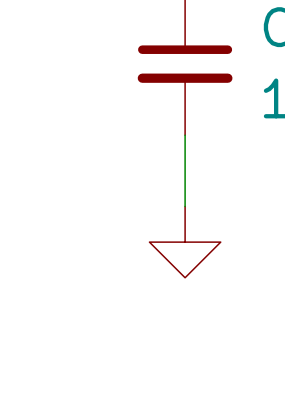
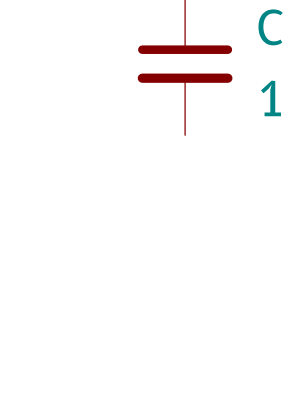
wire: (185, 135) (185, 206) -> none
power symbol: (185, 242) -> none

